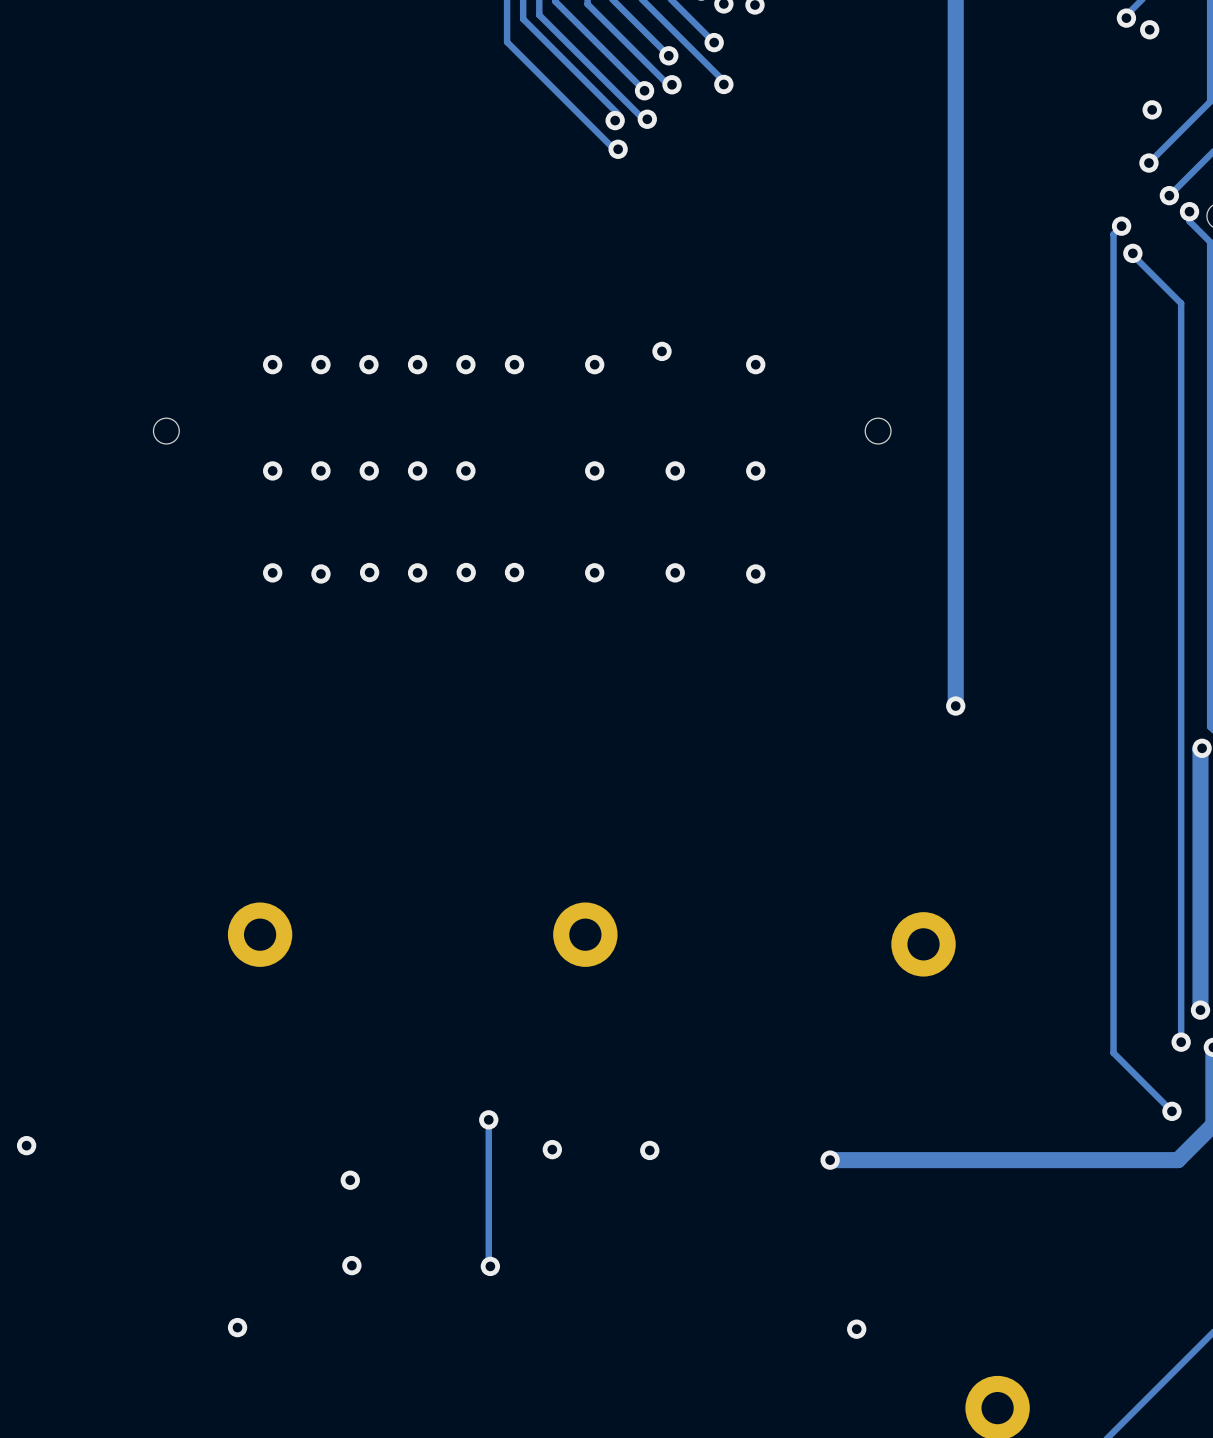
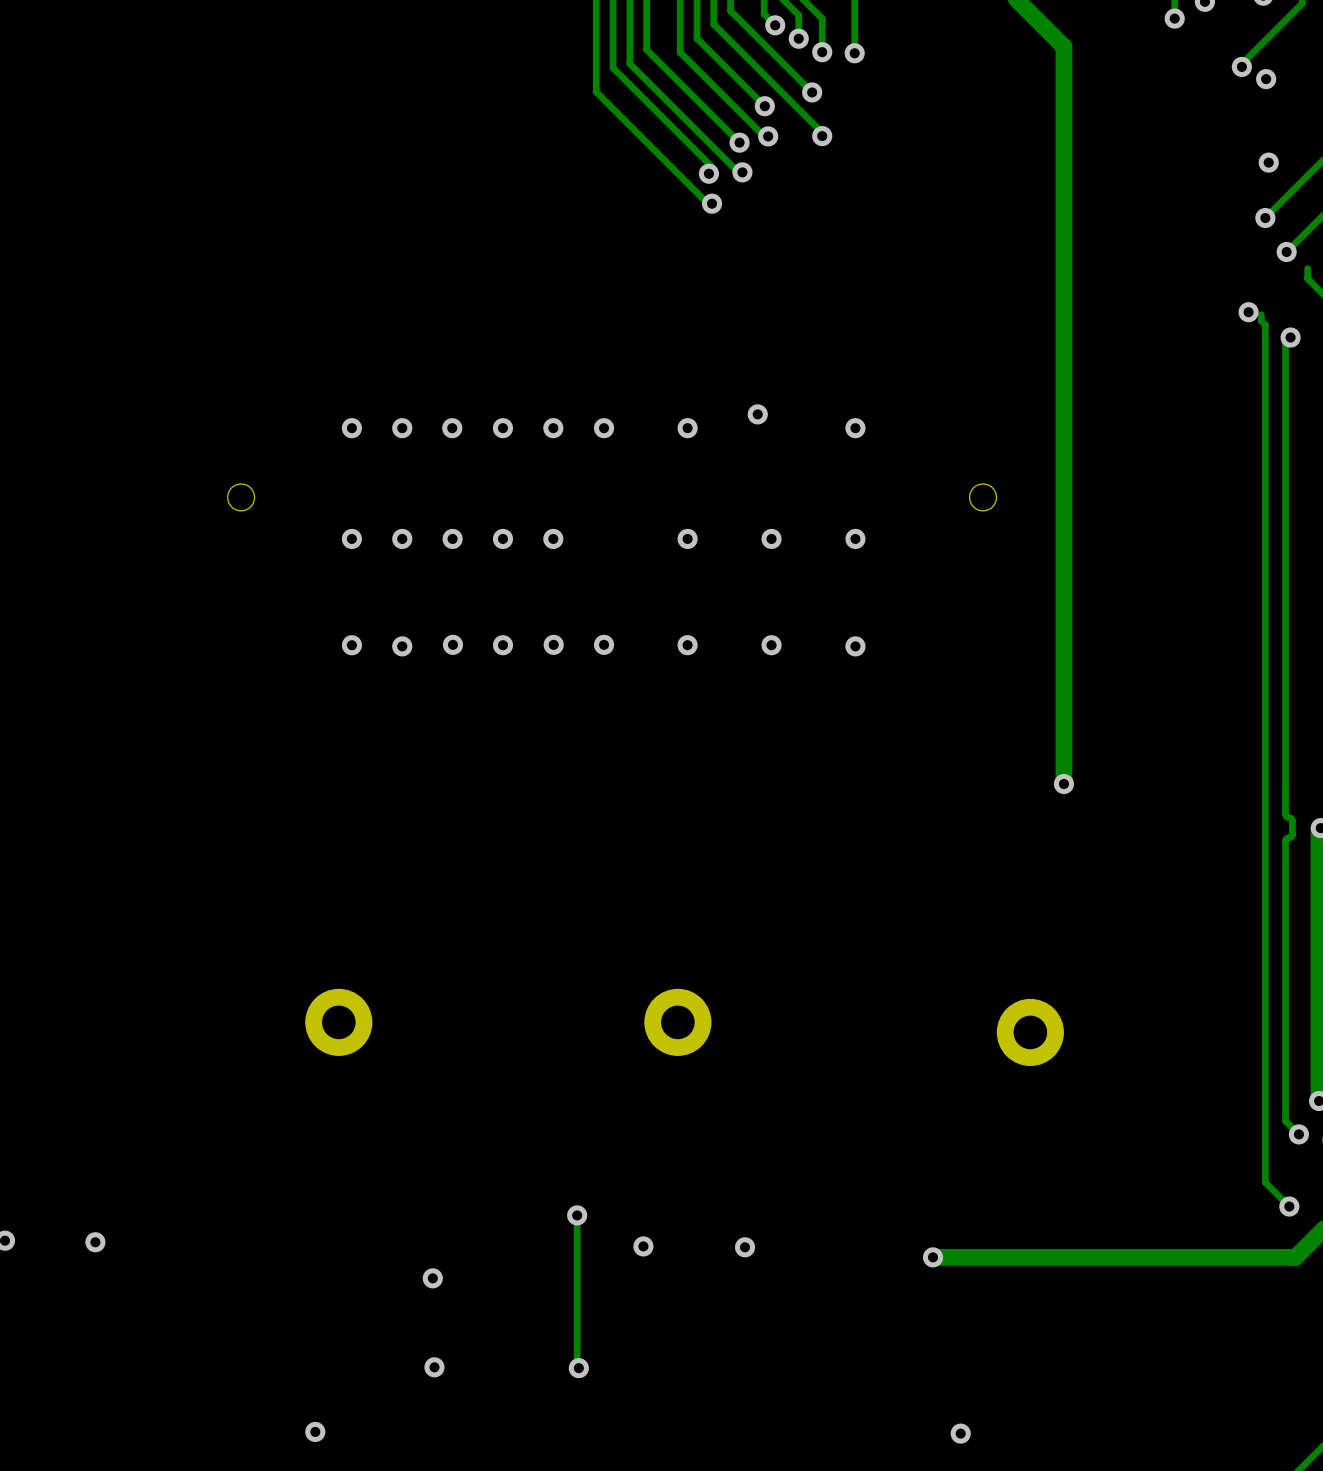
via: (1189, 211) -> none
track: (1121, 226) (1113, 234) (1113, 1052) (1148, 1088) -> (1261, 314) (1261, 320) (1265, 324) (1265, 1182)
via: (1121, 226) -> none
track: (1132, 253) (1181, 303) (1181, 1042) -> (1290, 337) (1285, 342) (1285, 814) (1292, 821) (1292, 835) (1285, 841) (1285, 1120) (1298, 1134)
via: none -> (1290, 337)

